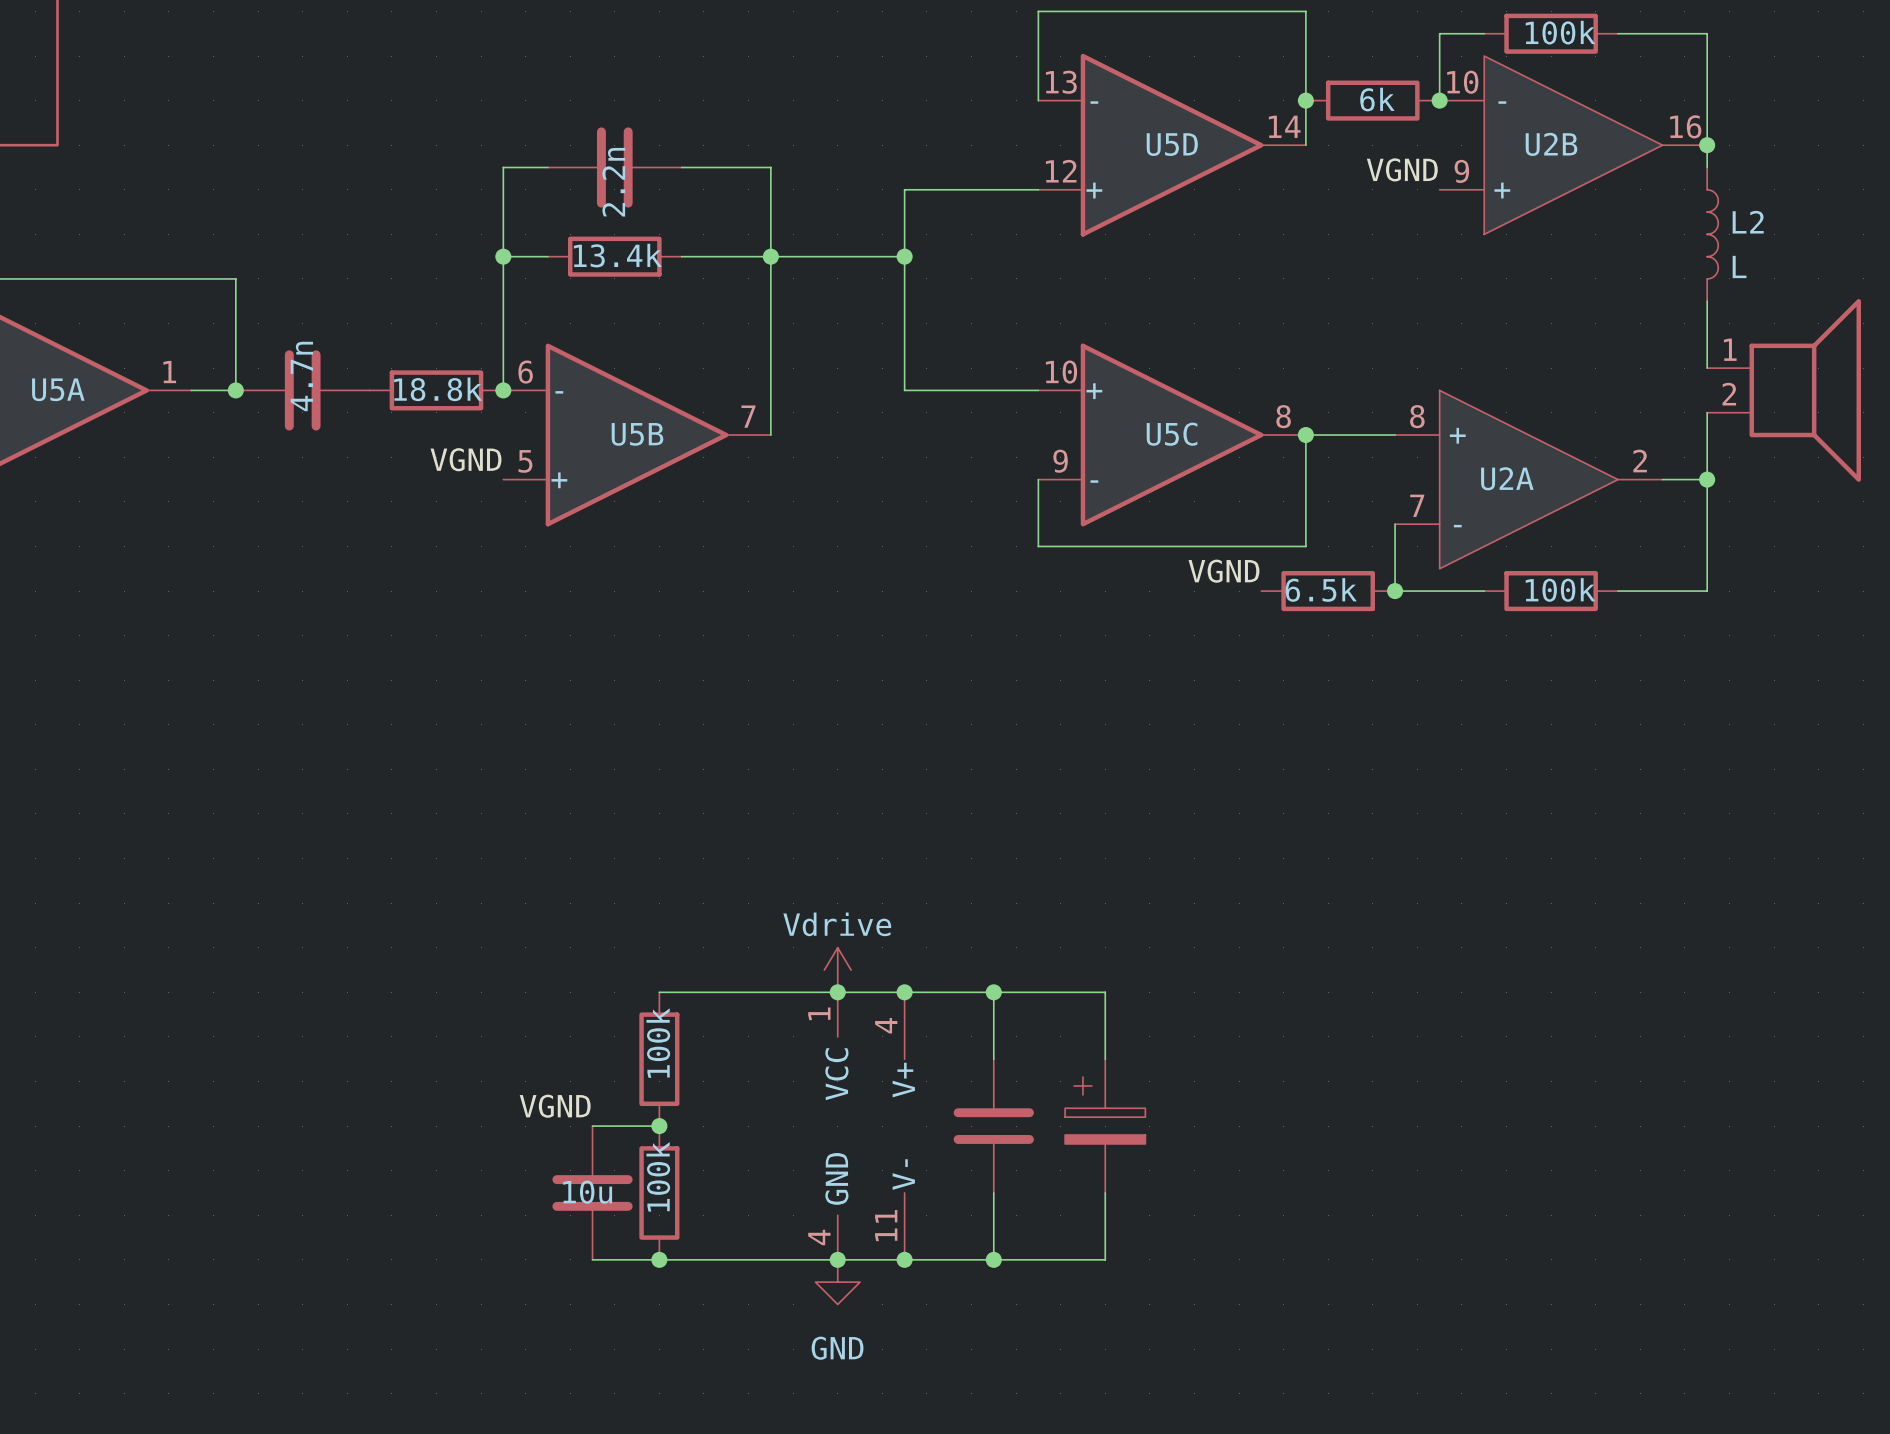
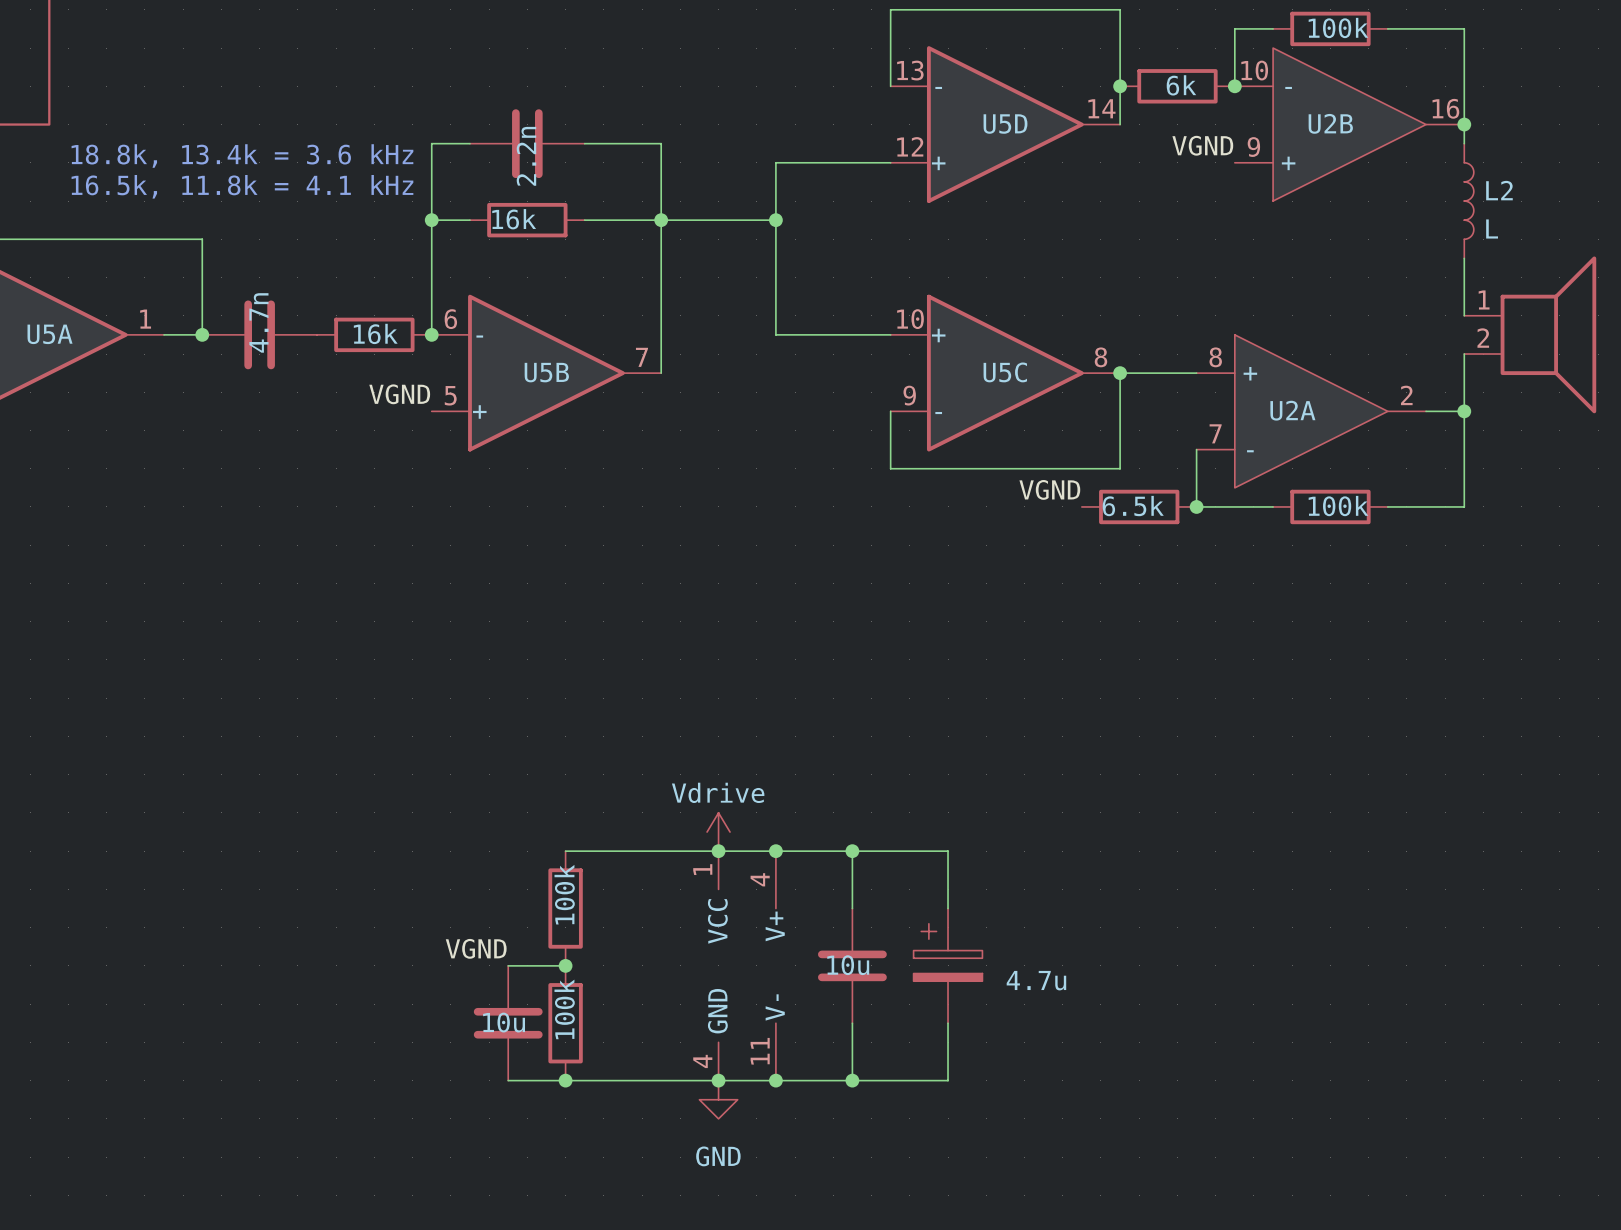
text: none -> 18.8k, 13.4k = 3.6 kHz (242, 156)
text: none -> 16.5k, 11.8k = 4.1 kHz (242, 186)
part value: 13.4k (617, 255) -> 16k (514, 219)
part value: 18.8k (438, 389) -> 16k (375, 333)
part value: none -> 10u (848, 965)
part value: none -> 4.7u (1036, 980)

